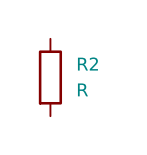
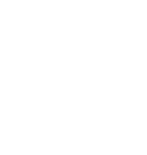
R2: R (50, 77) -> none

